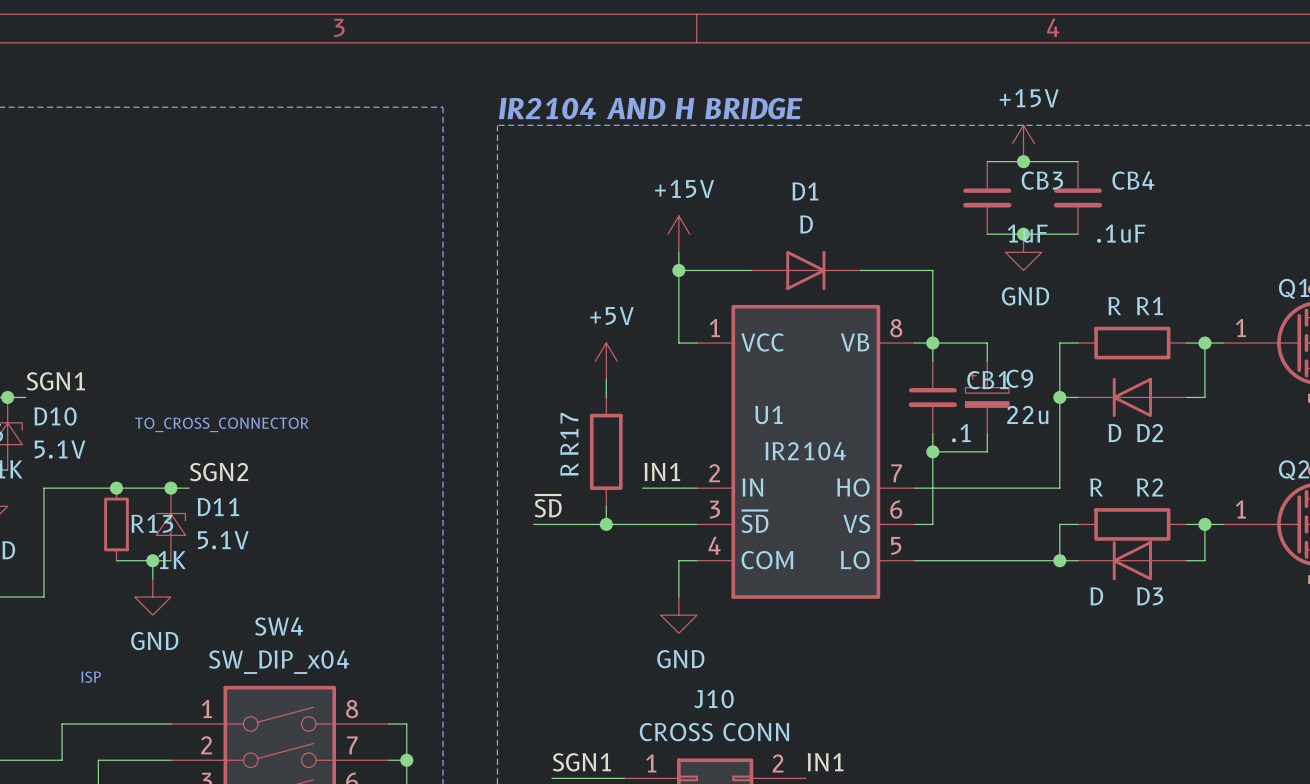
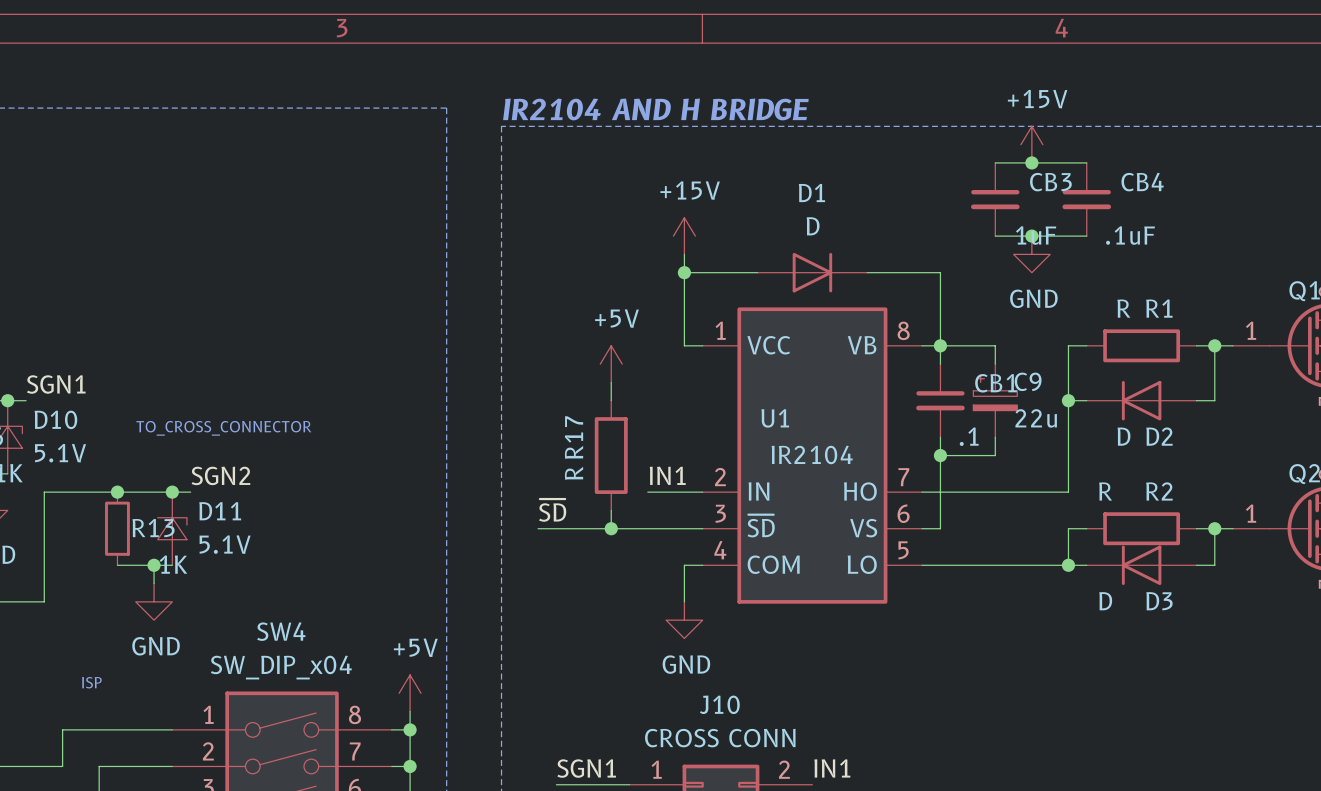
power symbol: none -> +5V (410, 693)
wire: none -> (410, 711) (410, 729)
junction: none -> (410, 729)

